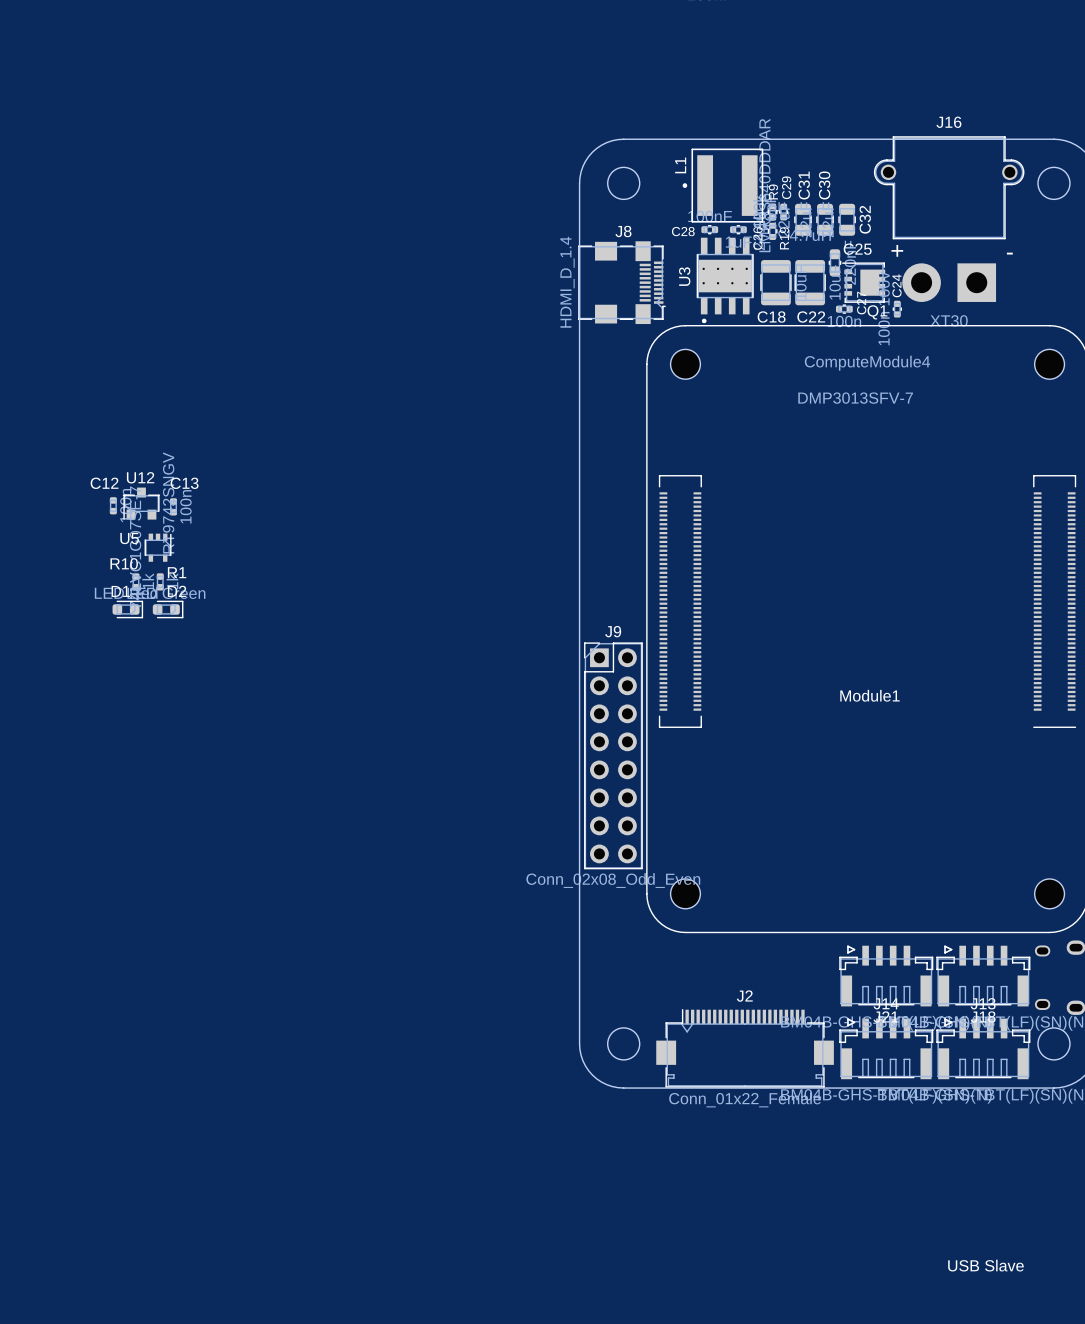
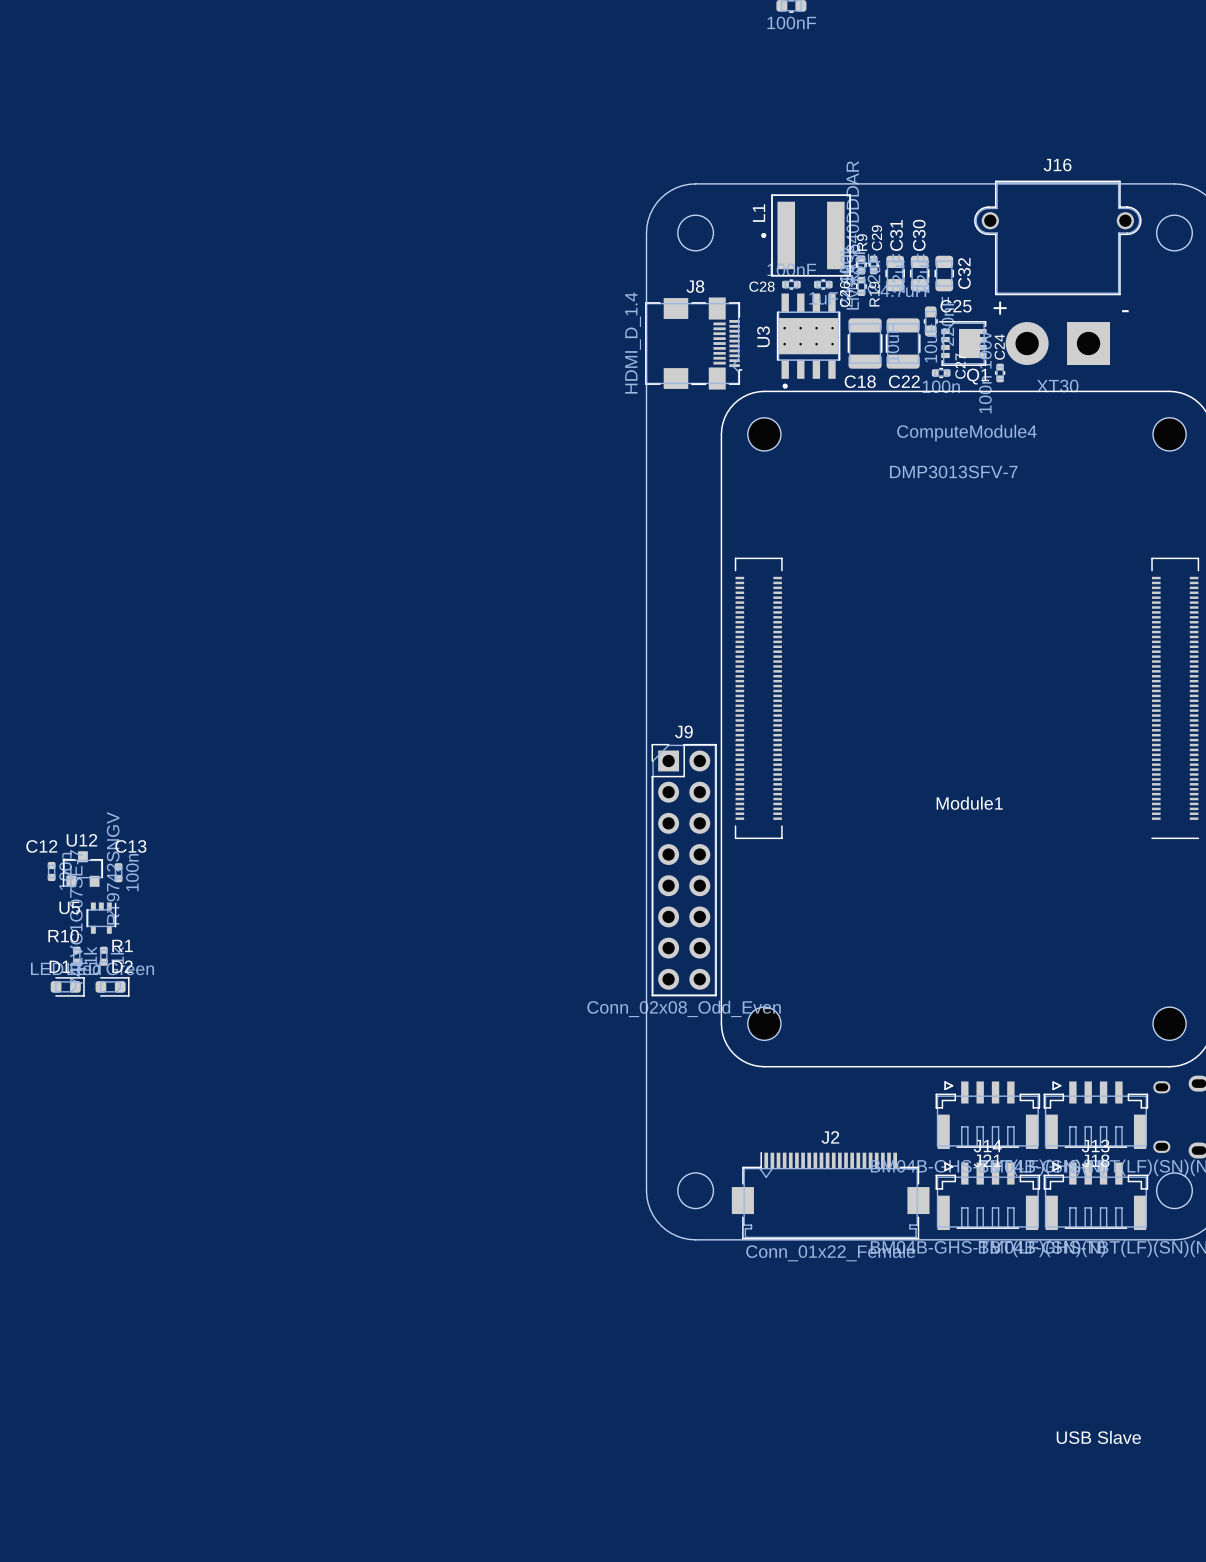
U12 position: (141, 503) -> (82, 869)
C12 position: (113, 505) -> (51, 871)
C13 position: (173, 506) -> (118, 872)
U5 position: (158, 547) -> (101, 918)
R10 position: (135, 581) -> (76, 956)
R1 position: (160, 581) -> (103, 956)
D1 position: (127, 609) -> (67, 986)
D2 position: (168, 609) -> (112, 986)

